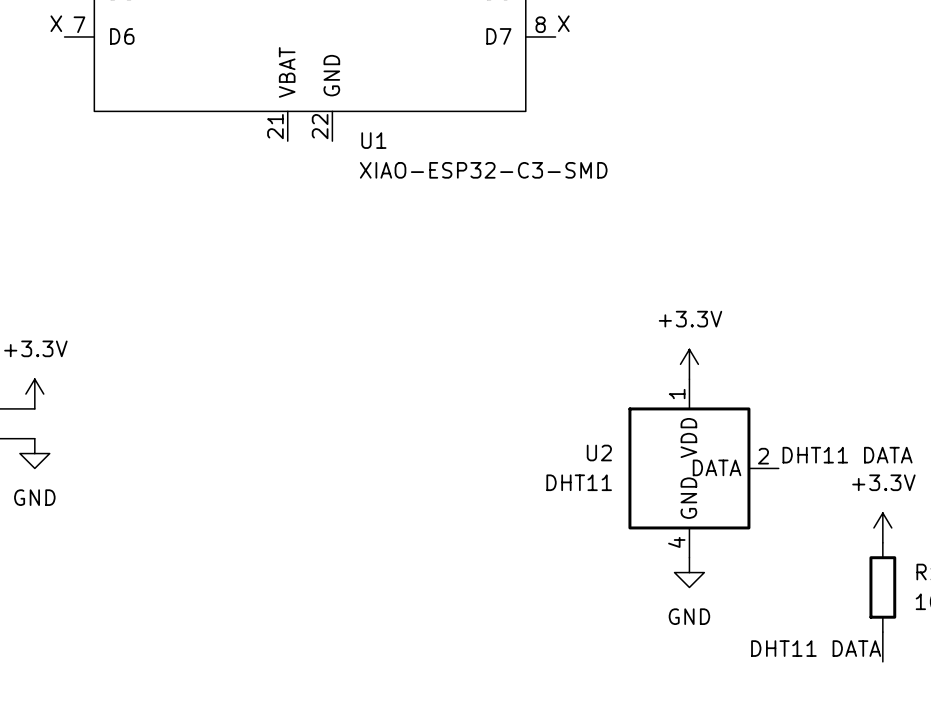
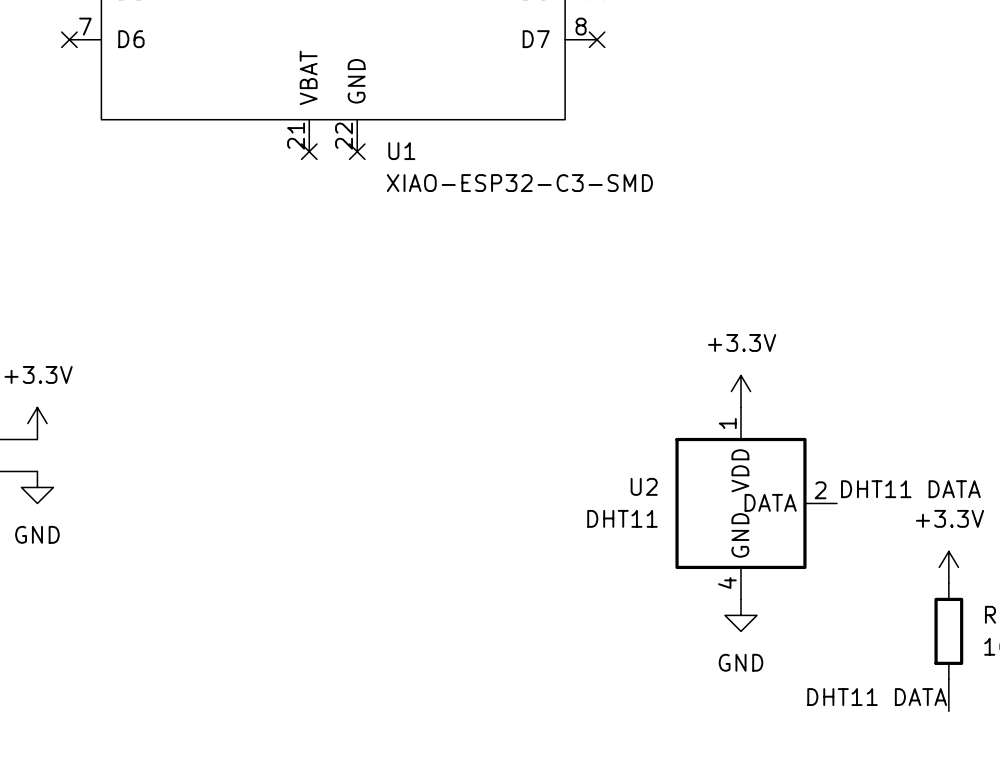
label: X (56, 23) -> none
label: X (563, 23) -> none
no-connect mark: none -> (69, 39)
no-connect mark: none -> (597, 39)
no-connect mark: none -> (309, 151)
no-connect mark: none -> (357, 151)

